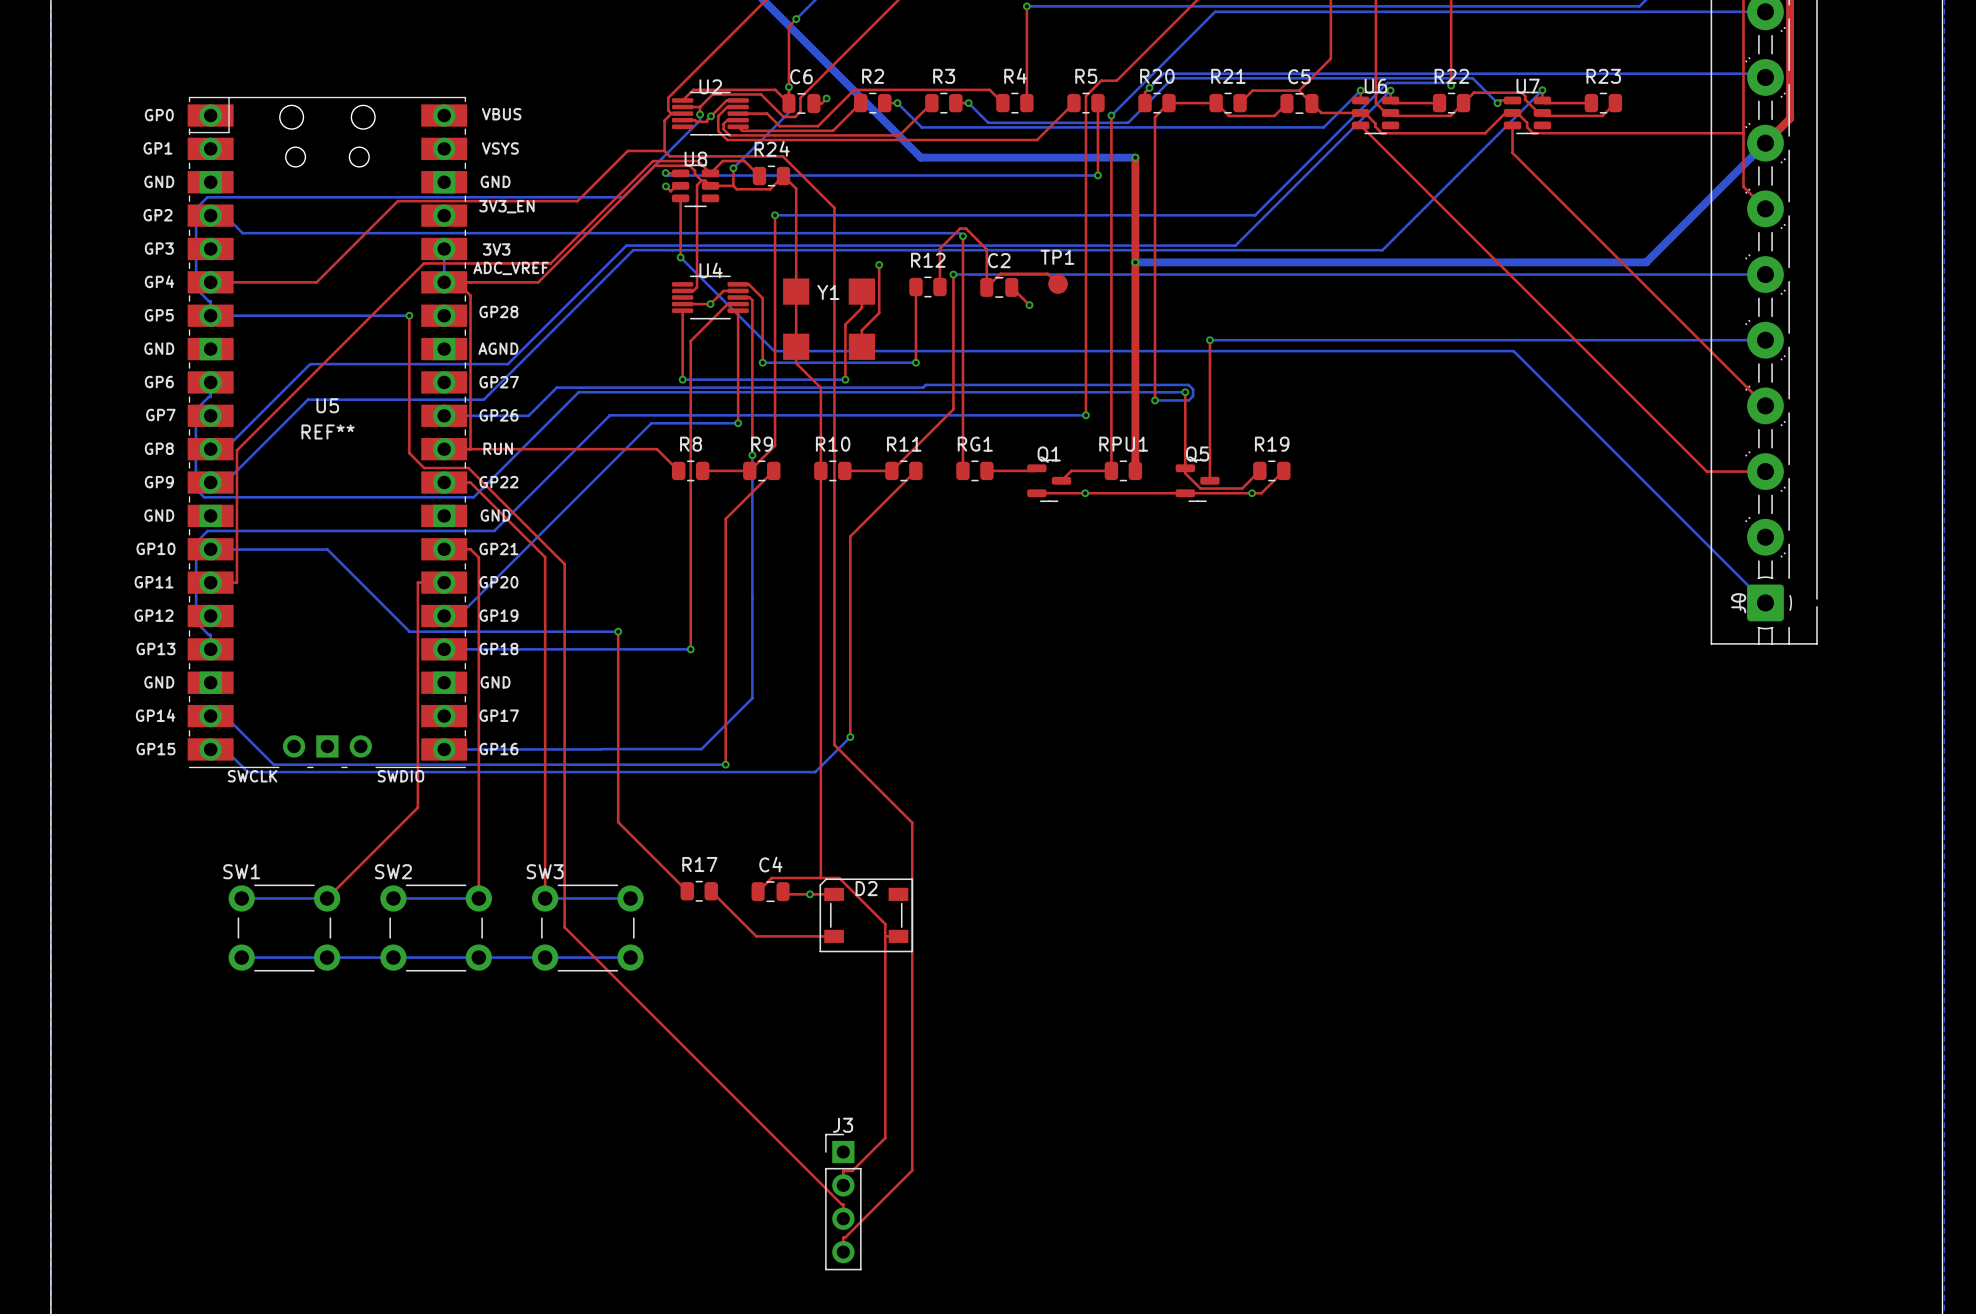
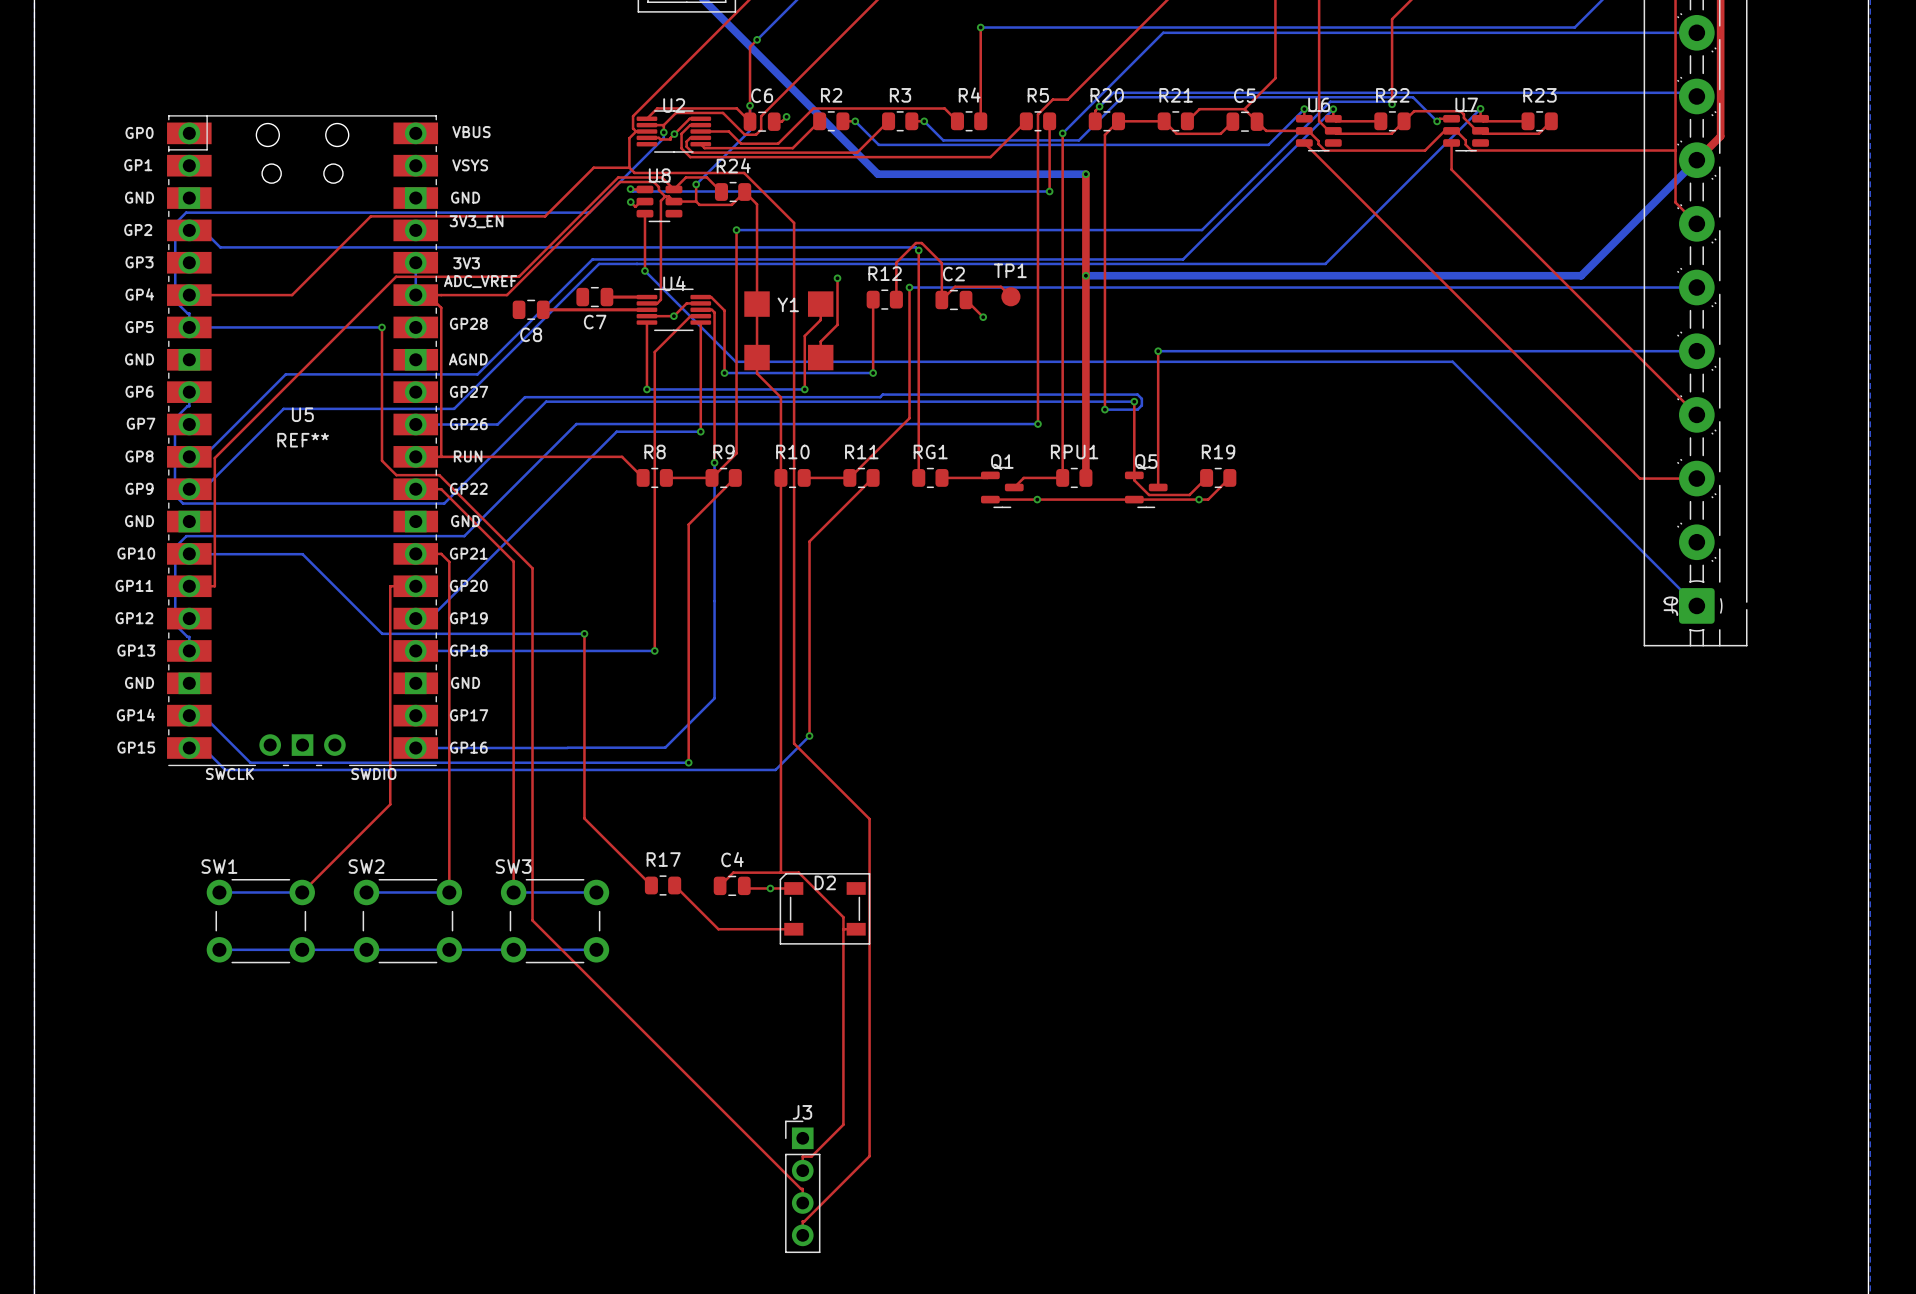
C7: none -> (594, 297)
top track: none -> (606, 297) (646, 297)
C8: none -> (531, 309)
top track: none -> (543, 309) (646, 309)

